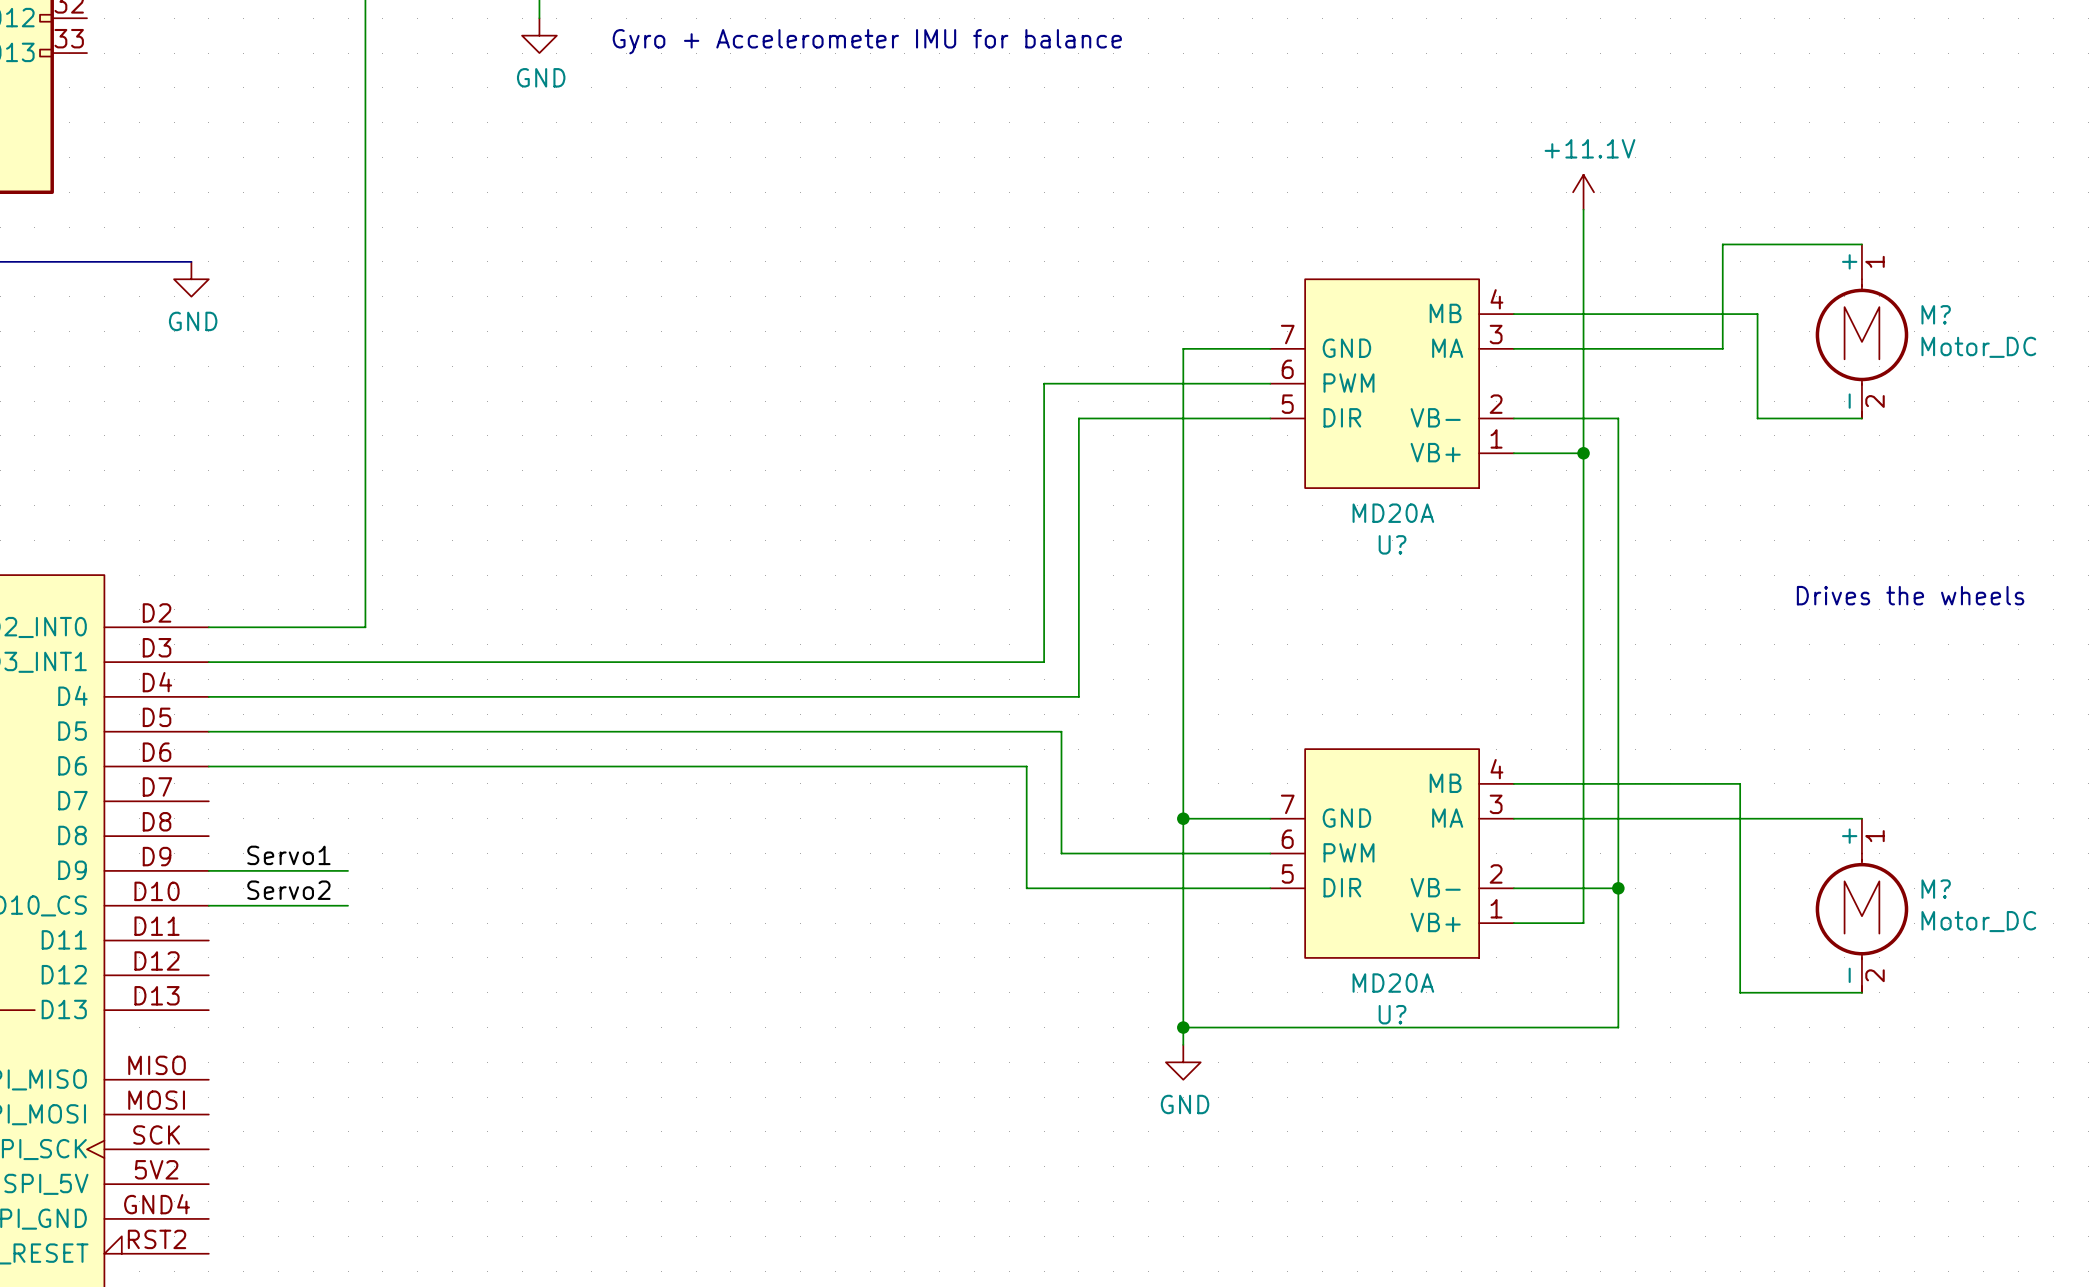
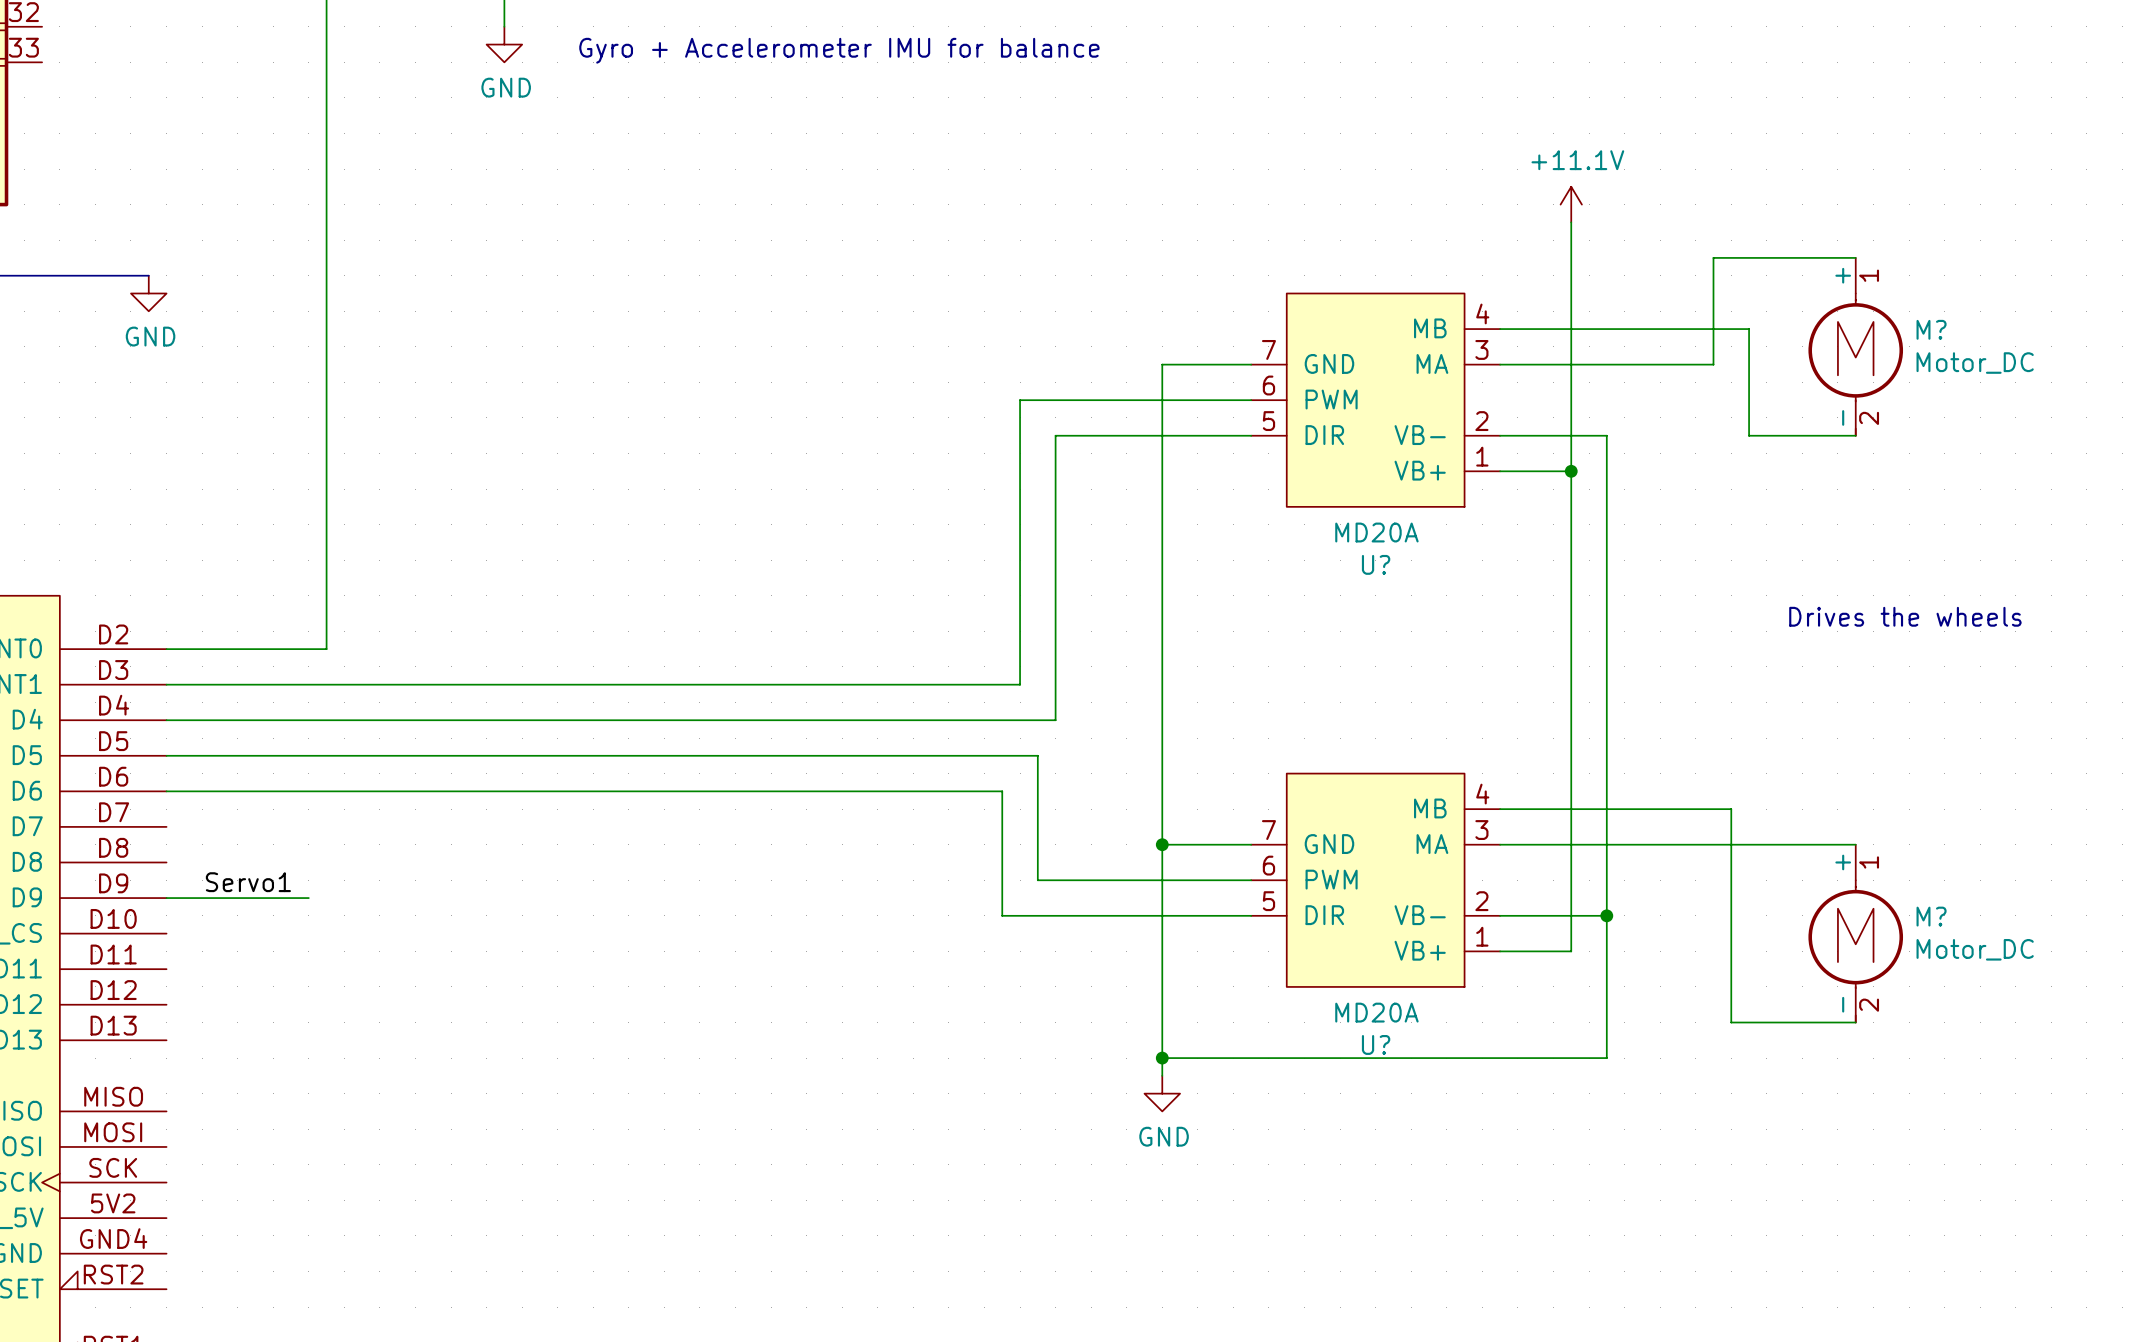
label: Servo2 (288, 890) -> none
wire: (208, 905) (348, 905) -> none

